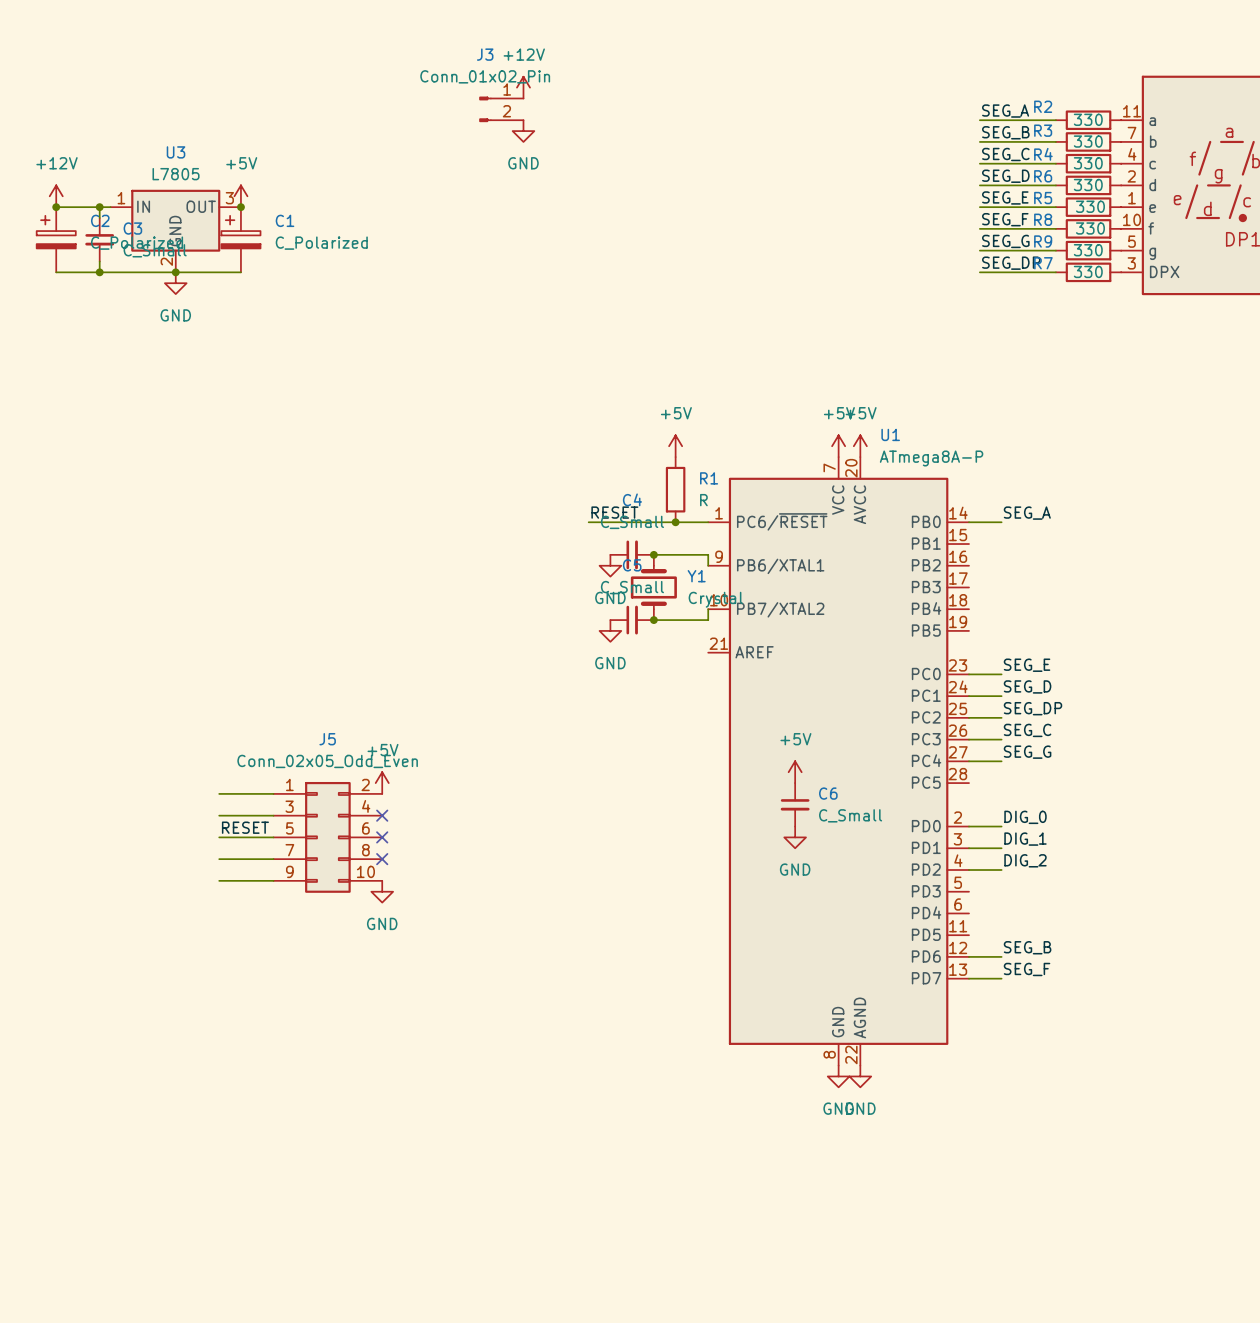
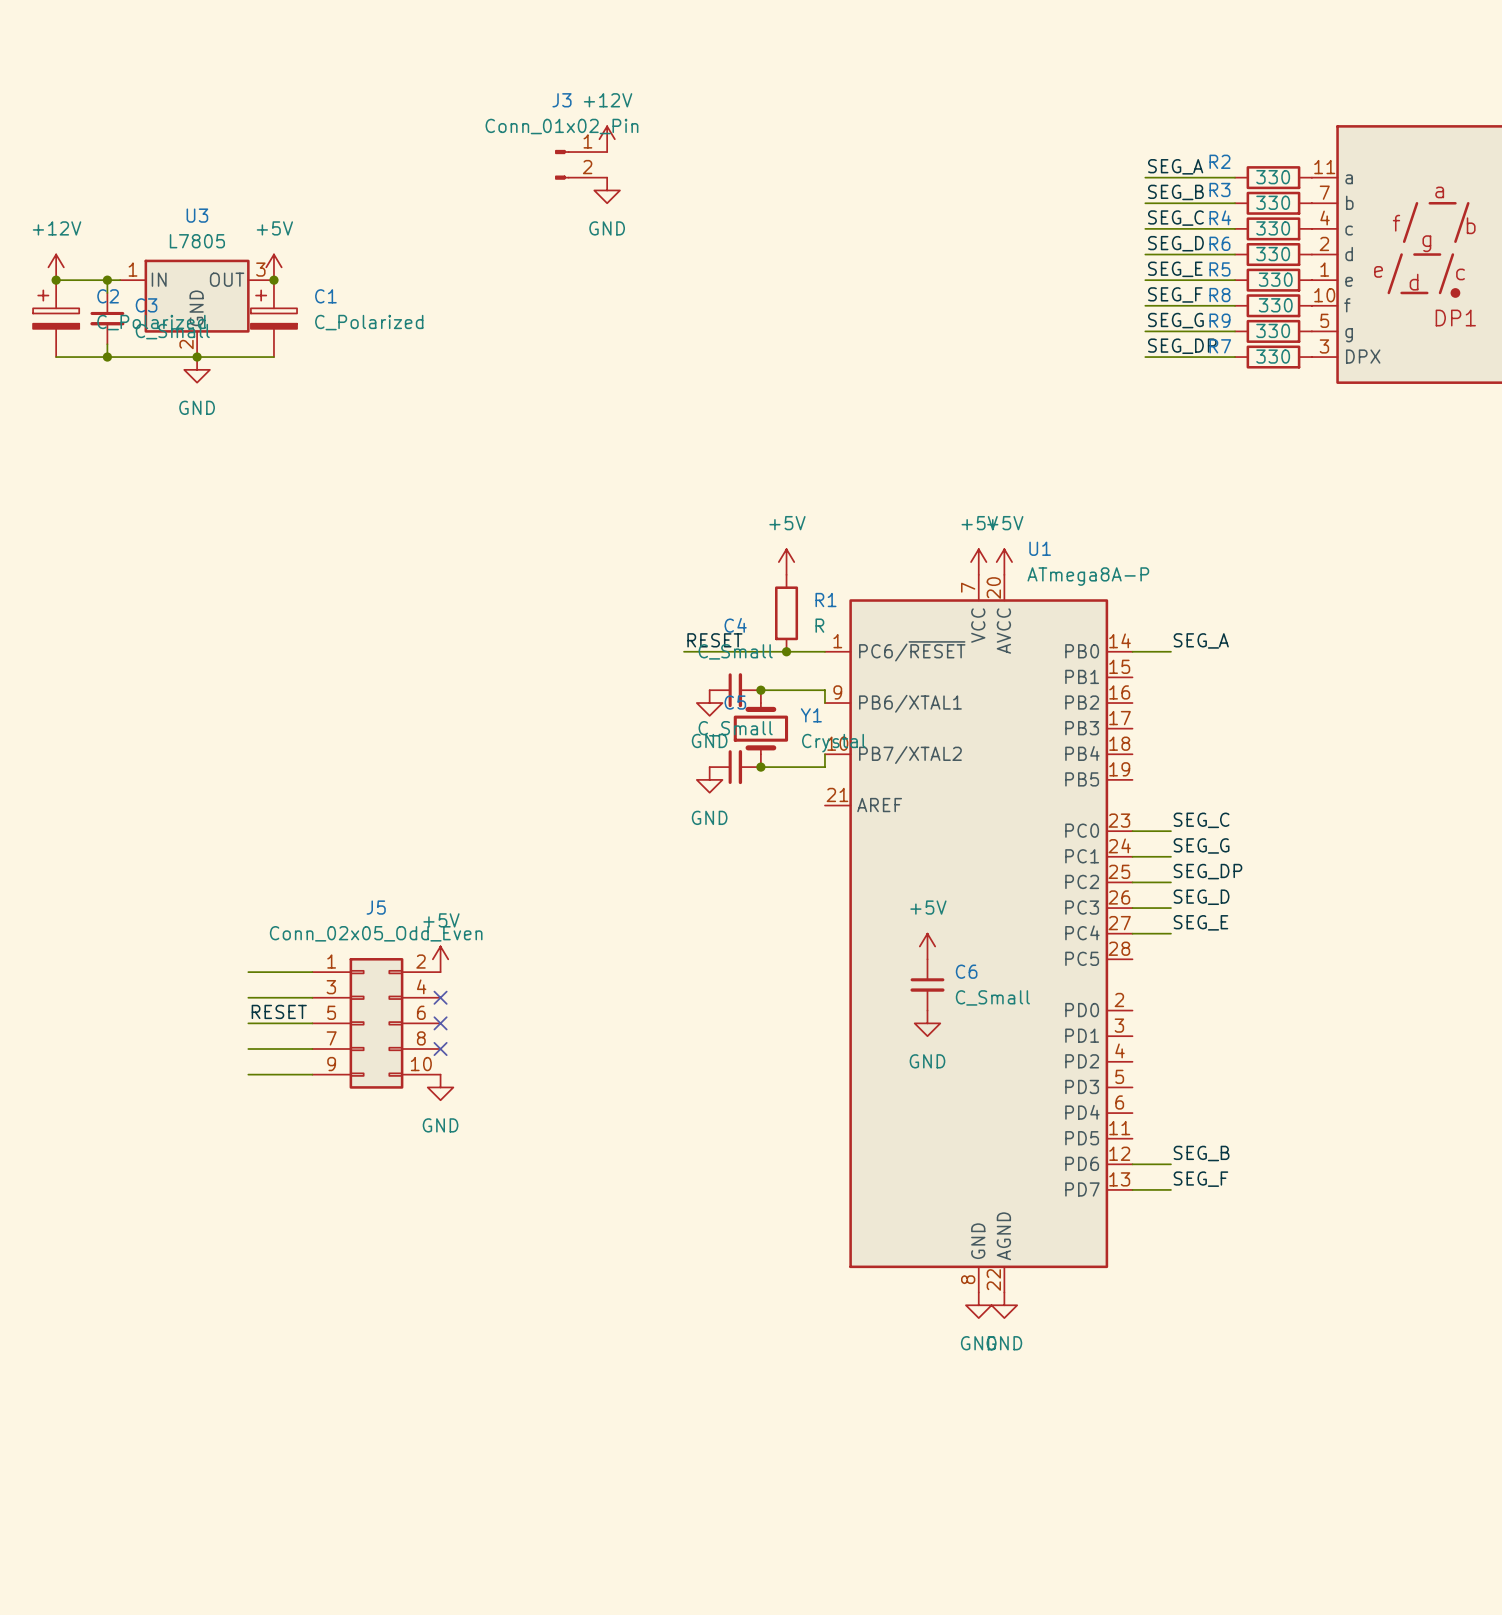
label: SEG_E (1027, 665) -> SEG_C (1201, 820)
label: SEG_D (1027, 686) -> SEG_G (1201, 845)
label: SEG_C (1027, 730) -> SEG_D (1201, 897)
label: SEG_G (1027, 752) -> SEG_E (1200, 922)
label: DIG_0 (1025, 817) -> none
wire: (969, 826) (1001, 826) -> none
label: DIG_1 (1025, 839) -> none
wire: (969, 848) (1001, 848) -> none
label: DIG_2 (1025, 860) -> none
wire: (969, 870) (1001, 870) -> none

